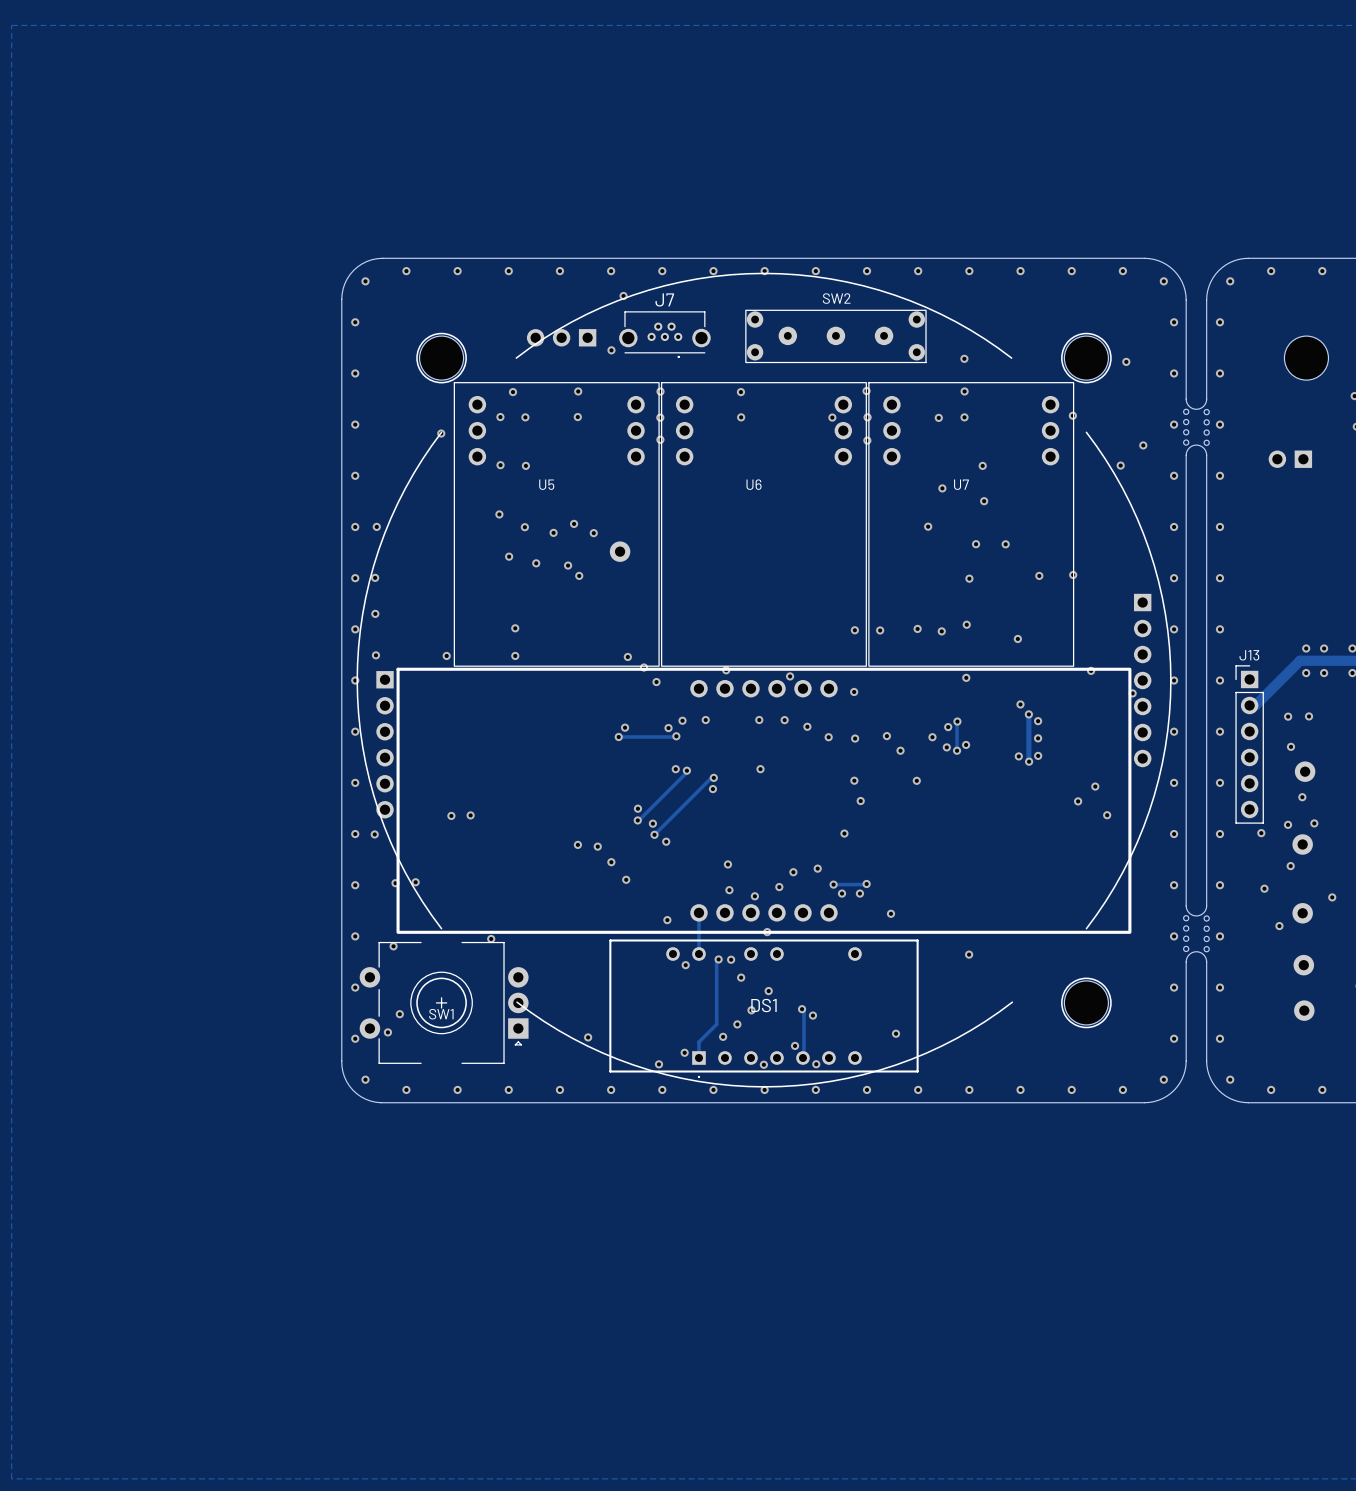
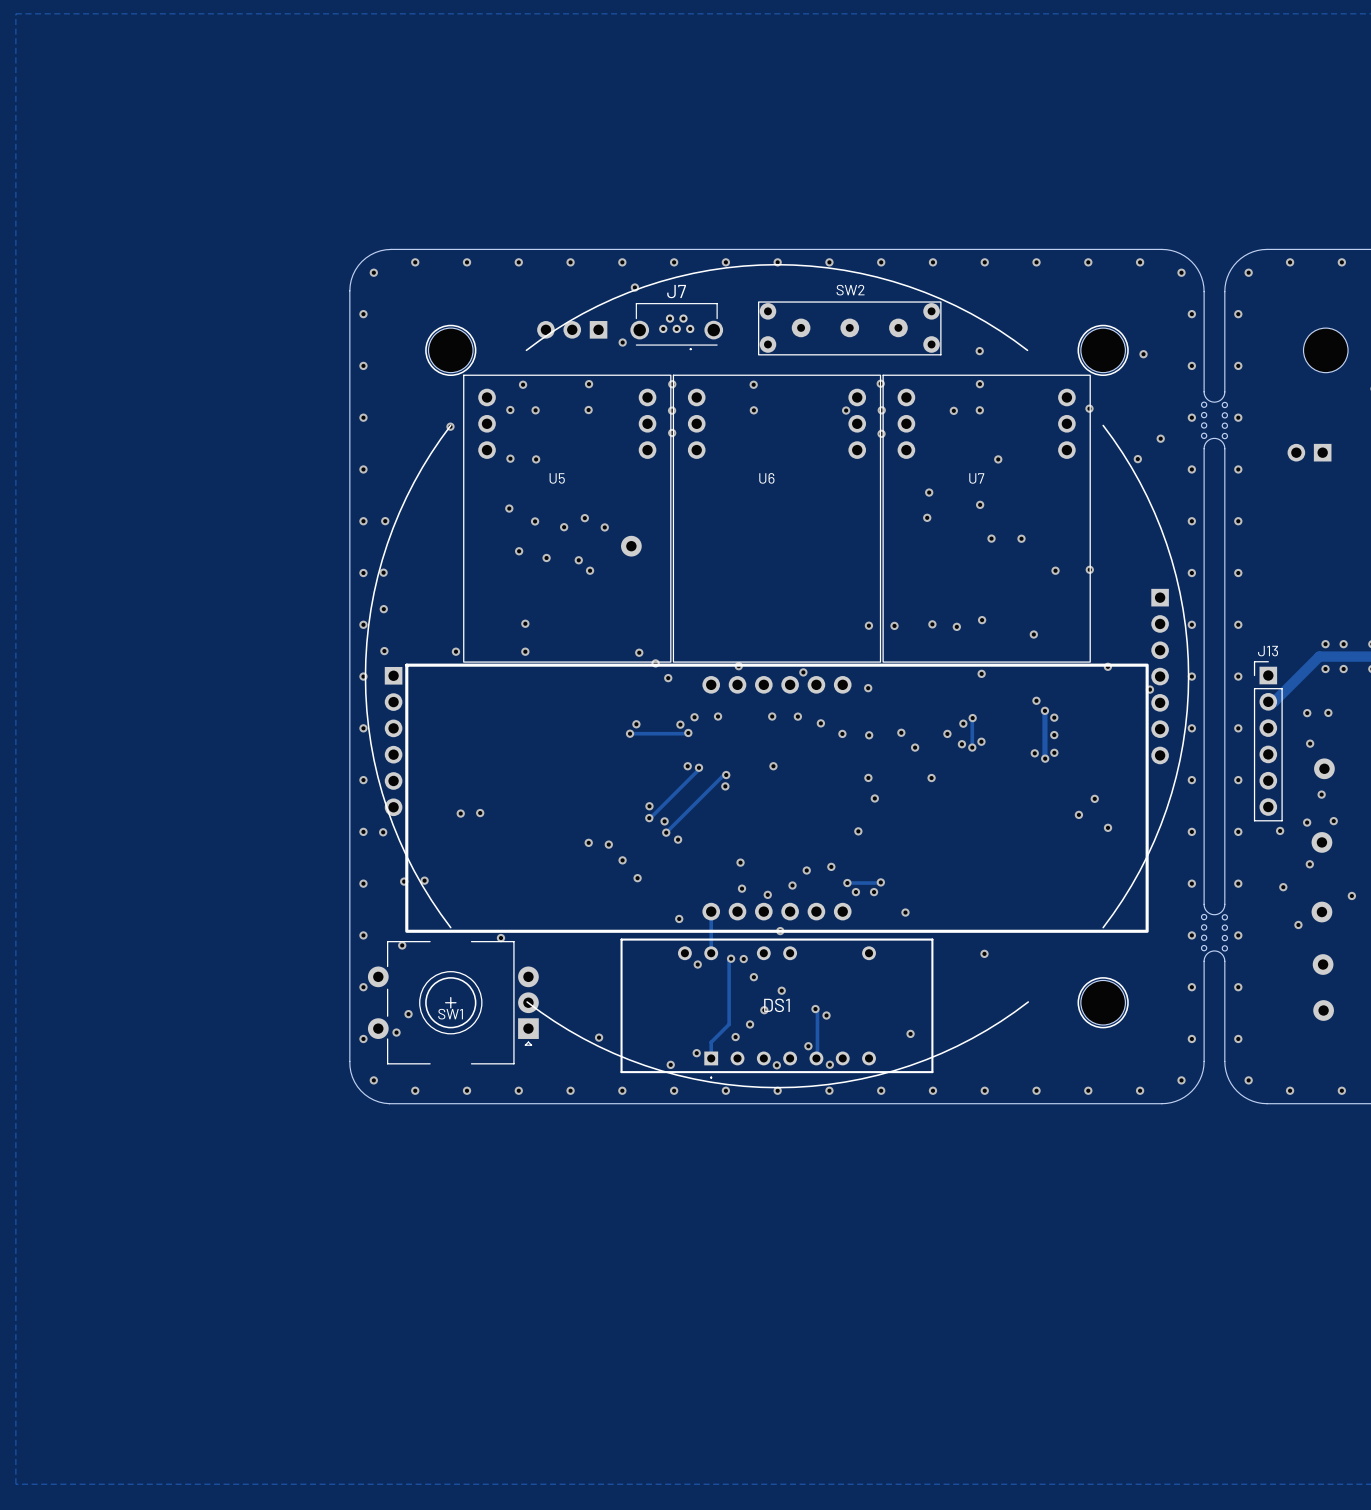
via: (942, 488) -> none
via: none -> (929, 492)
via: (984, 501) -> none
via: none -> (980, 504)
via: none -> (927, 517)
via: (928, 526) -> none
via: (969, 578) -> none
via: (1095, 786) -> none
via: (1107, 815) -> none
via: none -> (1078, 814)
via: none -> (1108, 827)

